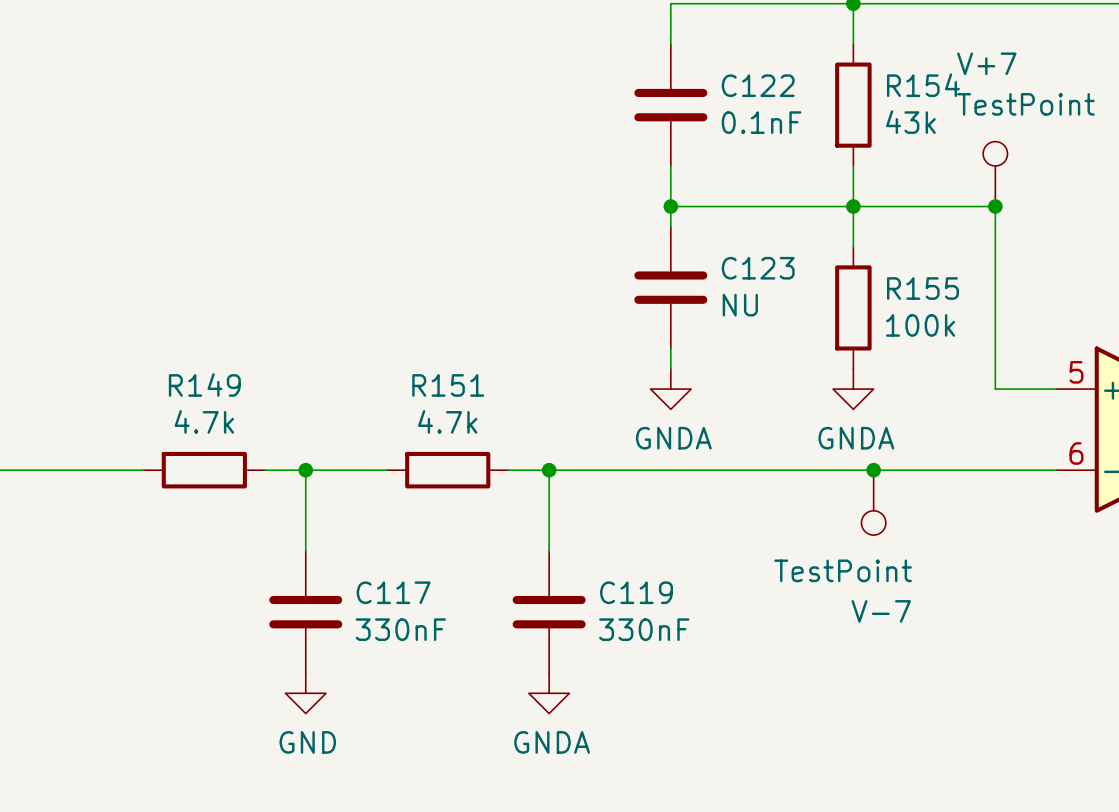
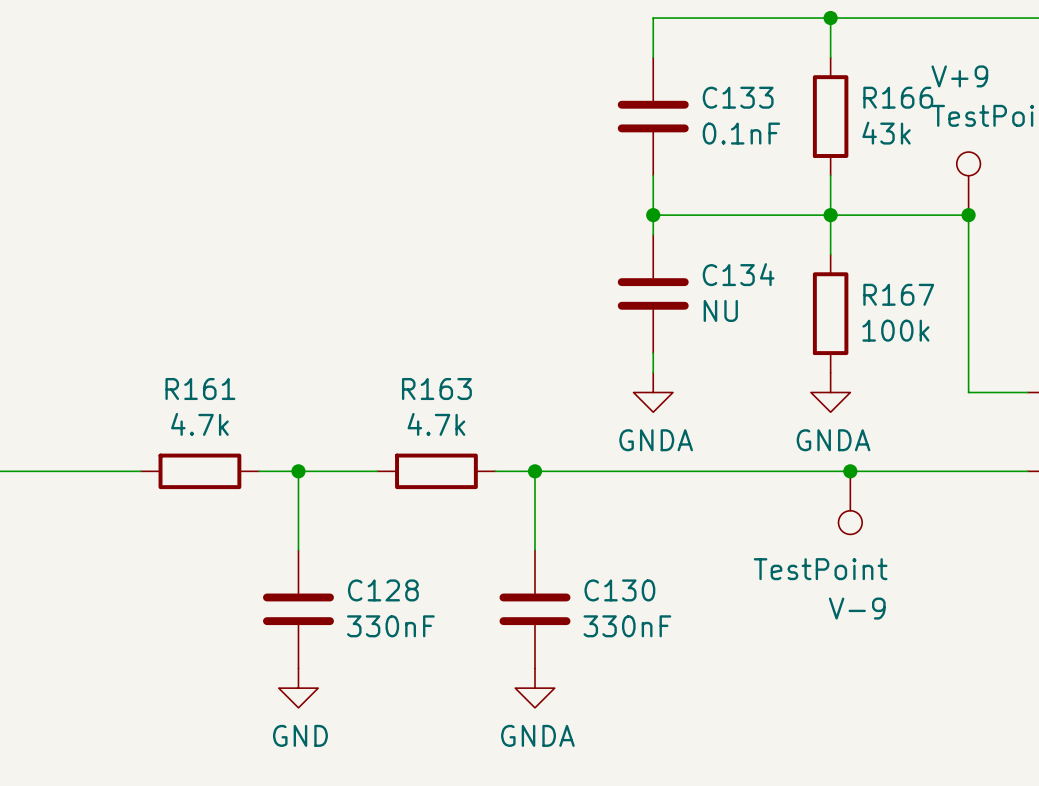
V+7 name: V+7 (986, 63) -> V+9 (959, 76)
C122 name: C122 (758, 85) -> C133 (738, 97)
R154 name: R154 (923, 85) -> R166 (898, 97)
C123 name: C123 (758, 268) -> C134 (738, 274)
R155 name: R155 (922, 288) -> R167 (898, 294)
R149 name: R149 (204, 384) -> R161 (200, 389)
R151 name: R151 (448, 385) -> R163 (436, 389)
C117 name: C117 (393, 592) -> C128 (383, 590)
C119 name: C119 (636, 592) -> C130 (619, 590)
V-7 name: V-7 (881, 611) -> V-9 (857, 608)

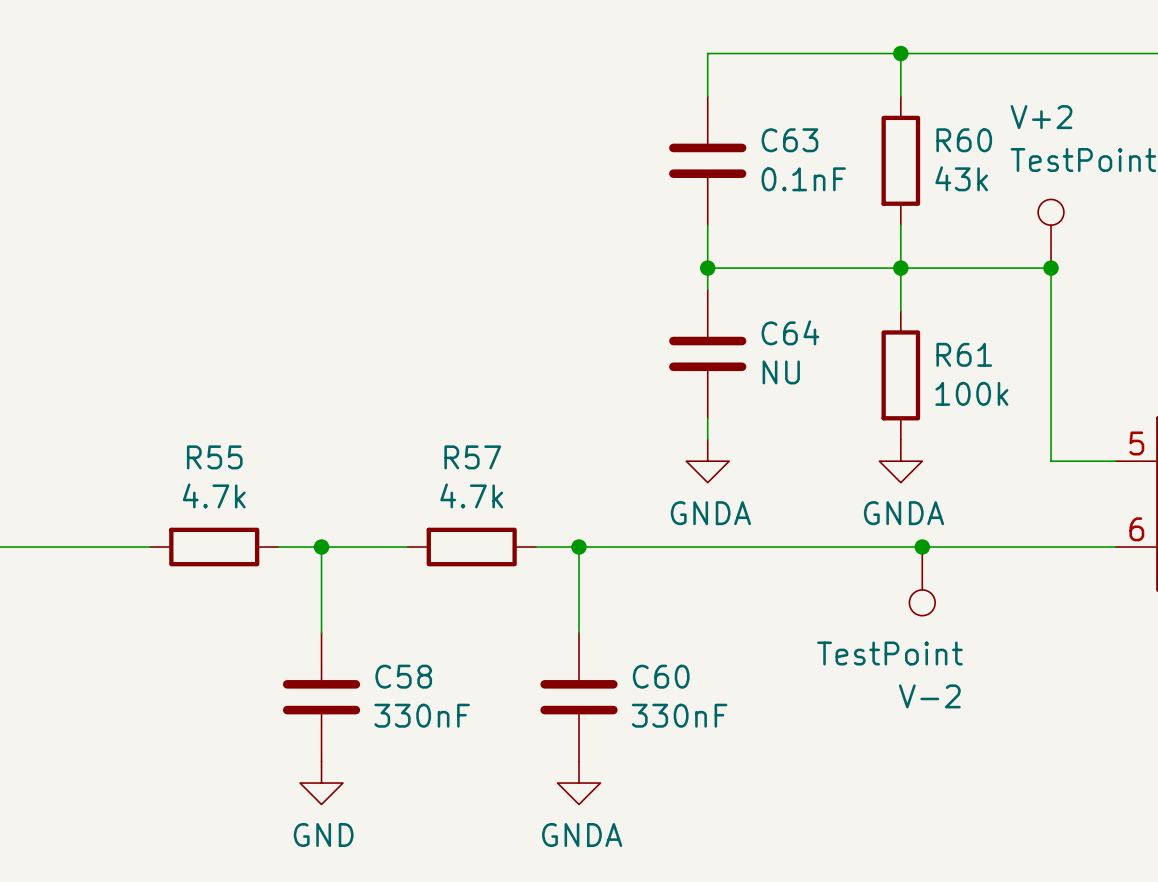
V+9 name: V+9 (959, 76) -> V+2 (1041, 117)
C133 name: C133 (738, 97) -> C63 (789, 140)
R166 name: R166 (898, 97) -> R60 (964, 140)
C134 name: C134 (738, 274) -> C64 (790, 332)
R167 name: R167 (898, 294) -> R61 (964, 354)
R161 name: R161 (200, 389) -> R55 (214, 457)
R163 name: R163 (436, 389) -> R57 (472, 457)
C128 name: C128 (383, 590) -> C58 (403, 676)
C130 name: C130 (619, 590) -> C60 (661, 676)
V-9 name: V-9 (857, 608) -> V-2 (929, 696)

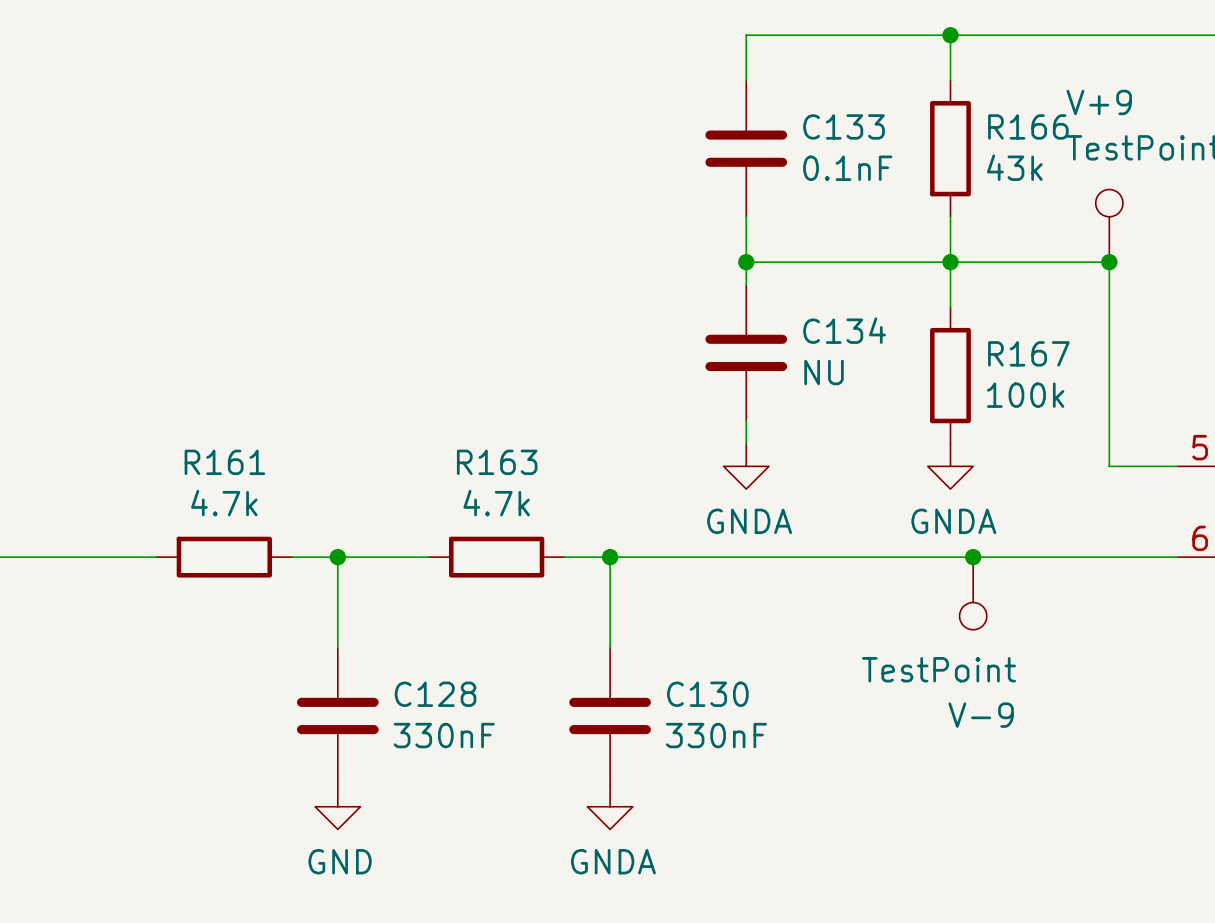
V+2 name: V+2 (1041, 117) -> V+9 (1099, 102)
C63 name: C63 (789, 140) -> C133 (844, 126)
R60 name: R60 (964, 140) -> R166 (1028, 126)
C64 name: C64 (790, 332) -> C134 (844, 330)
R61 name: R61 (964, 354) -> R167 (1028, 353)
R55 name: R55 (214, 457) -> R161 (224, 462)
R57 name: R57 (472, 457) -> R163 (497, 462)
C58 name: C58 (403, 676) -> C128 (435, 694)
C60 name: C60 (661, 676) -> C130 (707, 694)
V-2 name: V-2 (929, 696) -> V-9 (981, 715)

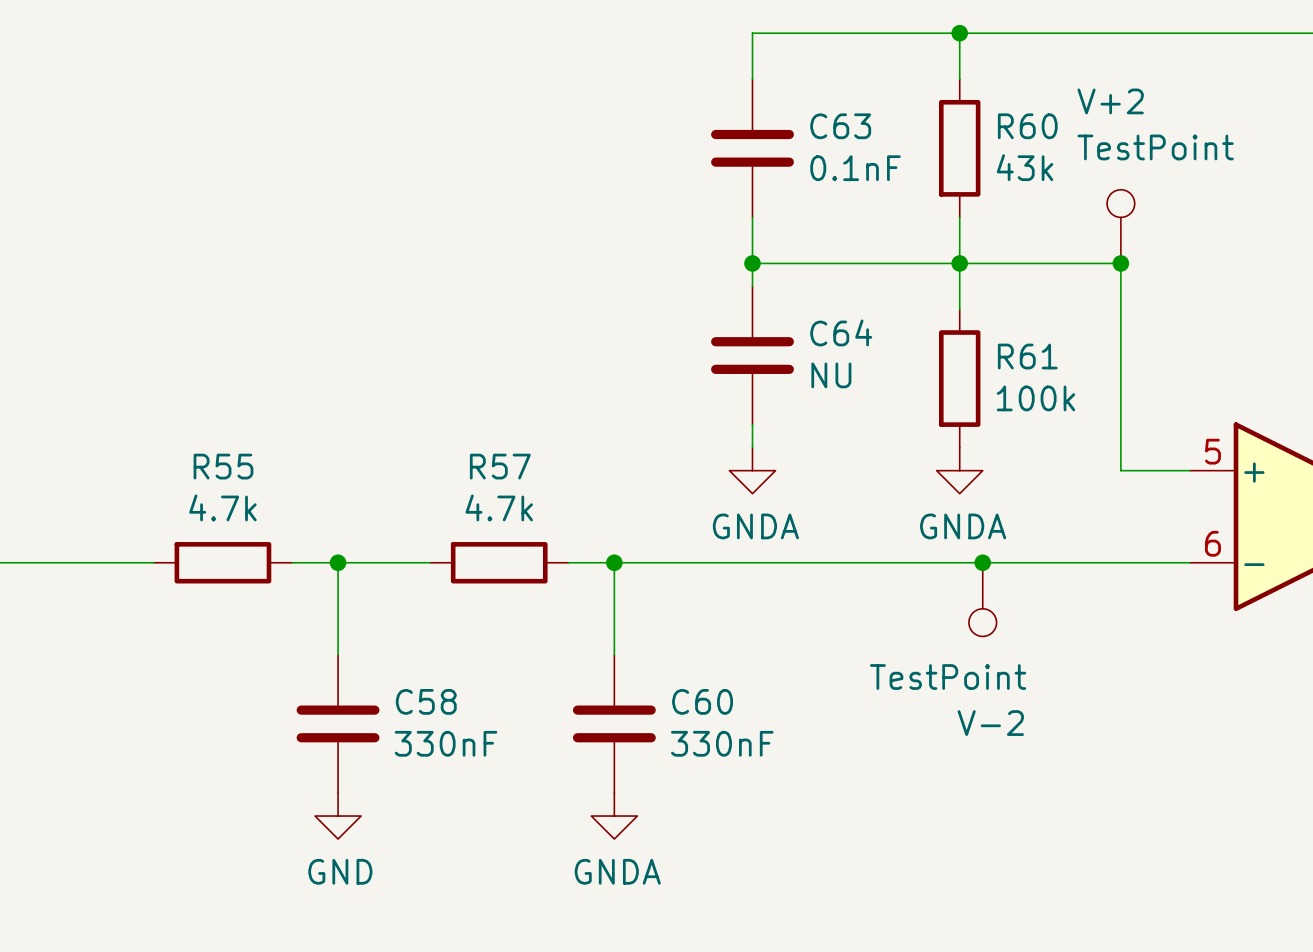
V+9 name: V+9 (1099, 102) -> V+2 (1110, 101)
C133 name: C133 (844, 126) -> C63 (840, 126)
R166 name: R166 (1028, 126) -> R60 (1027, 126)
C134 name: C134 (844, 330) -> C64 (841, 332)
R167 name: R167 (1028, 353) -> R61 (1027, 356)
R161 name: R161 (224, 462) -> R55 (223, 466)
R163 name: R163 (497, 462) -> R57 (500, 466)
C128 name: C128 (435, 694) -> C58 (426, 701)
C130 name: C130 (707, 694) -> C60 (702, 701)
V-9 name: V-9 (981, 715) -> V-2 (990, 723)

